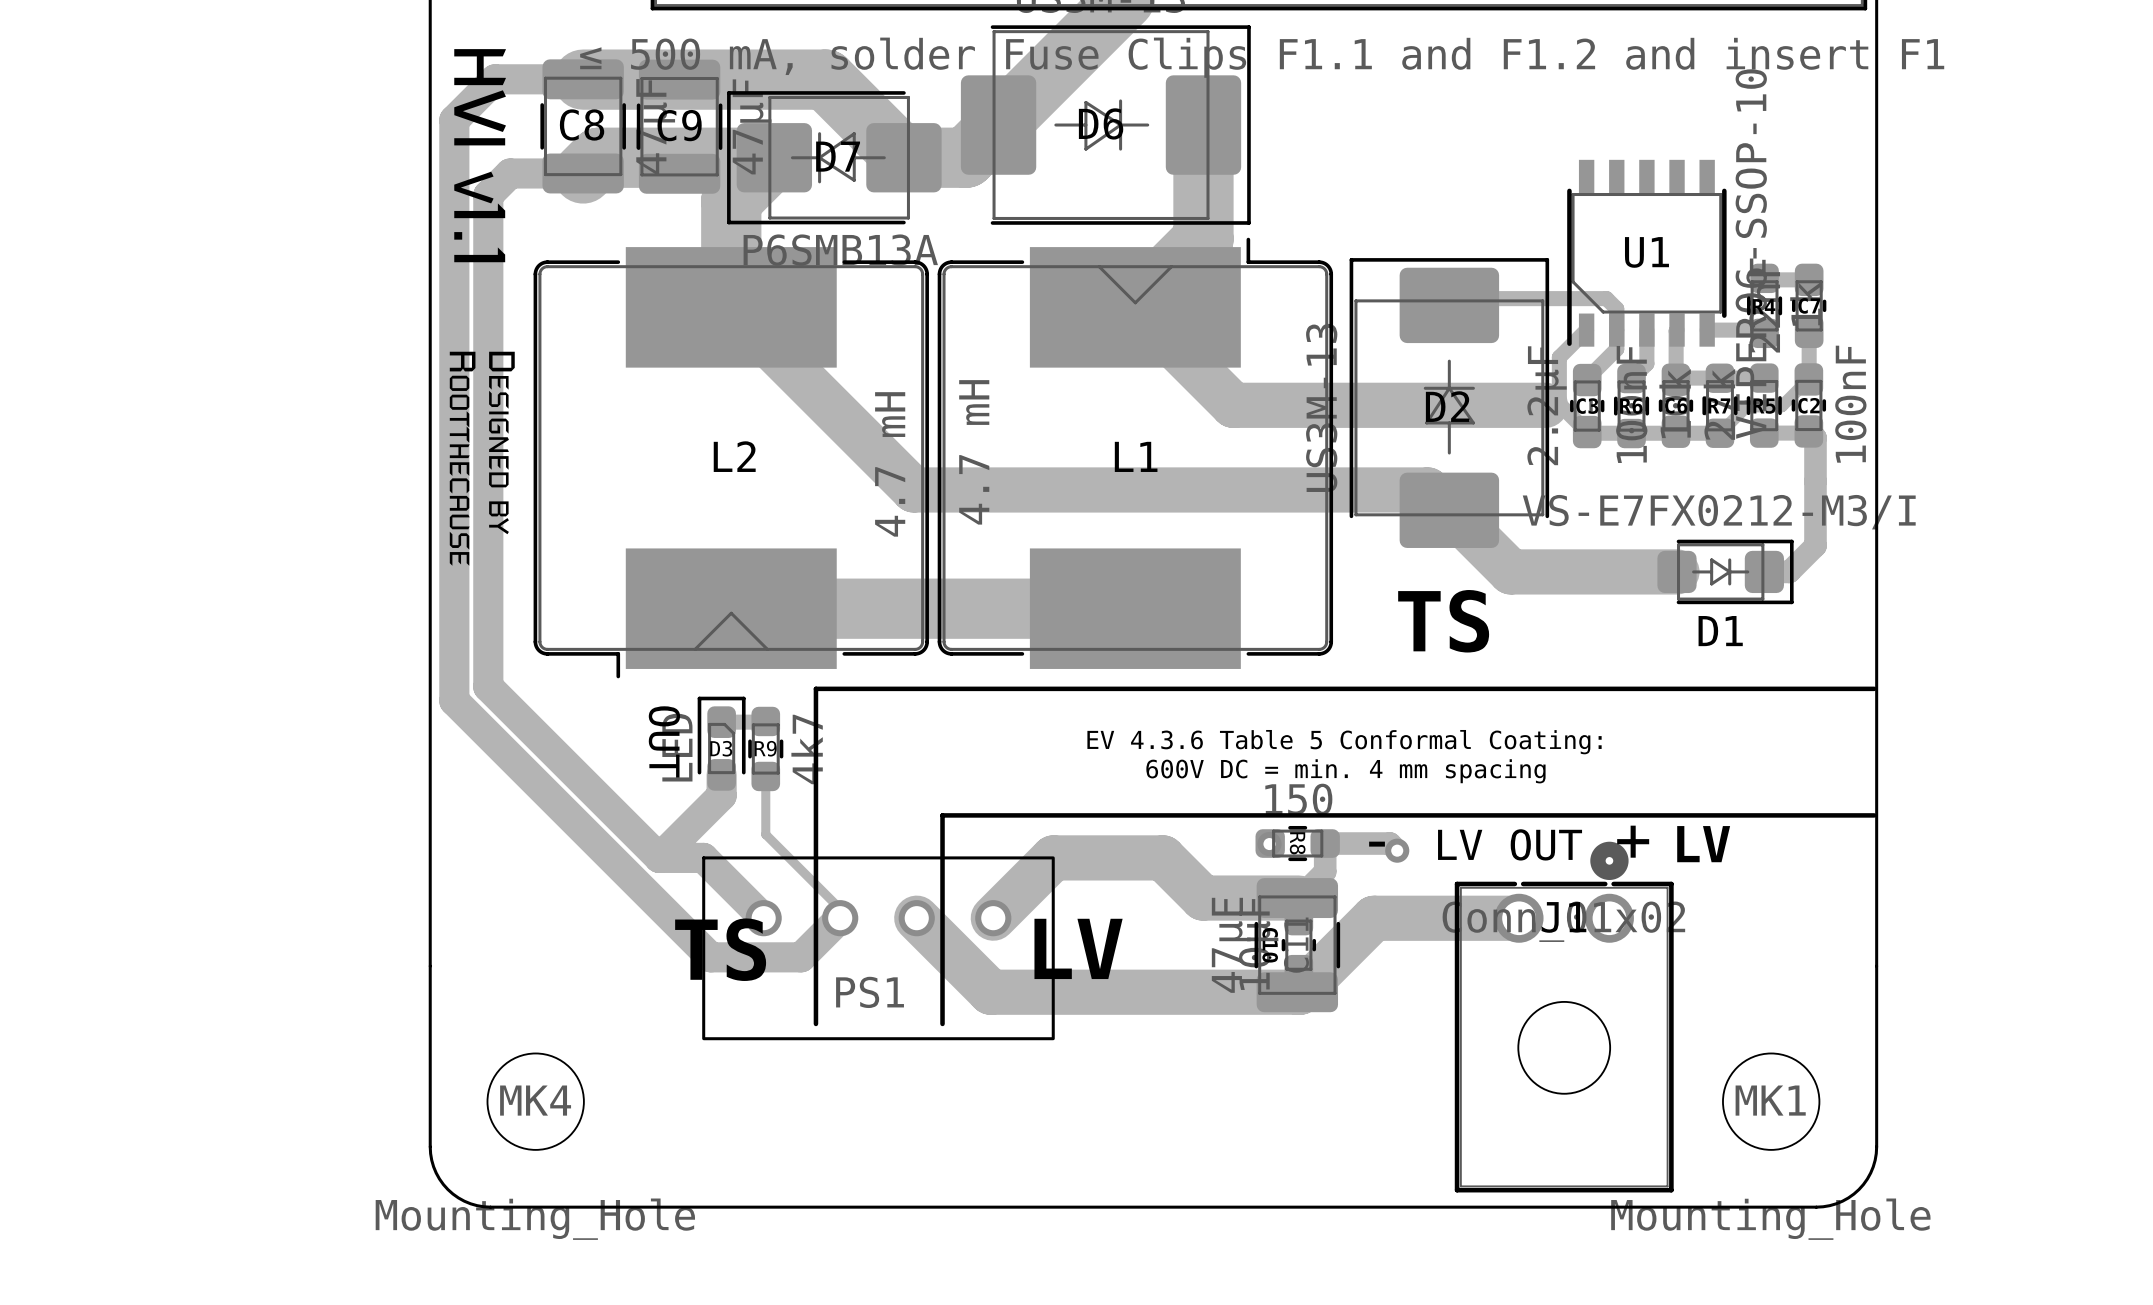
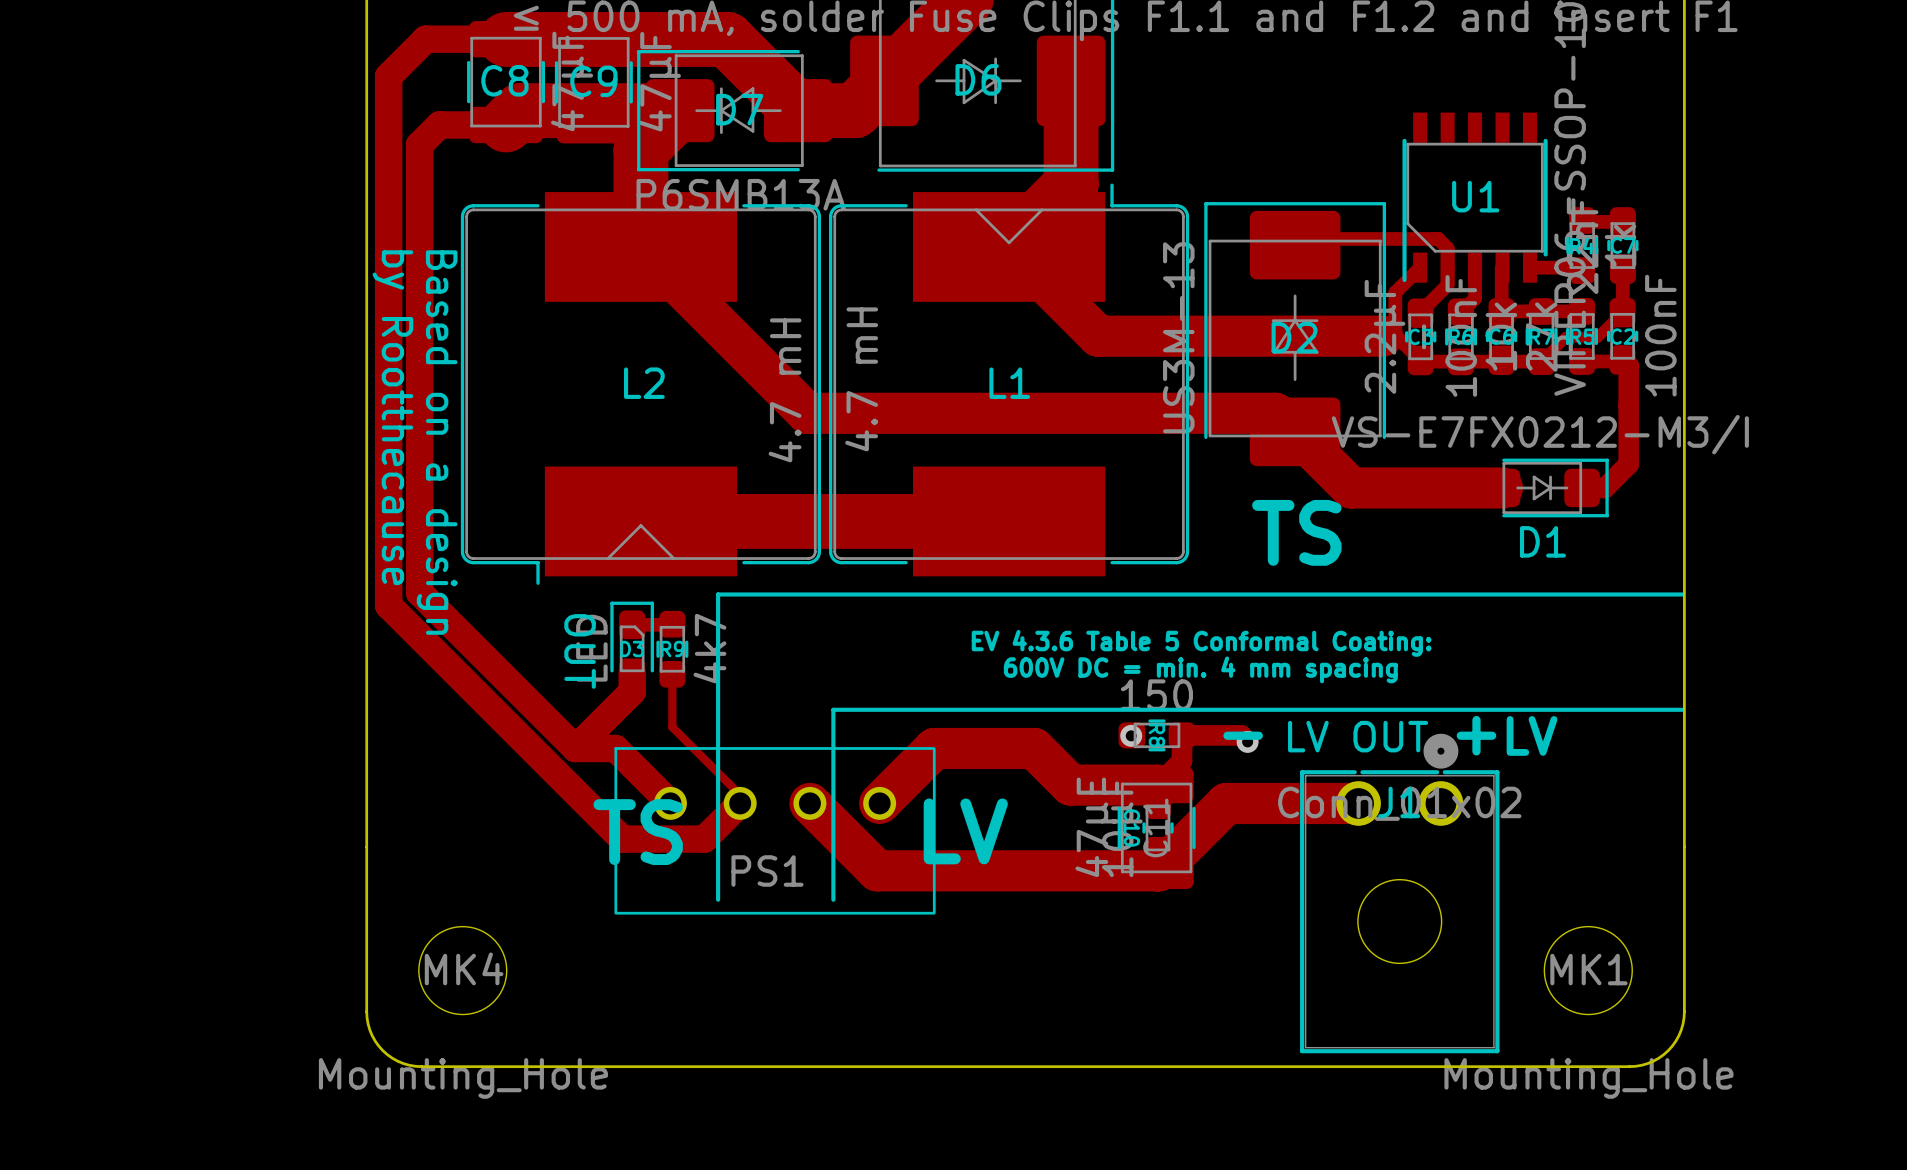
drawing: [454, 49, 507, 263] -> none
drawing: [449, 351, 515, 566] -> none
text: none -> by Rootthecause (392, 417)
text: none -> Based on a design (437, 442)

